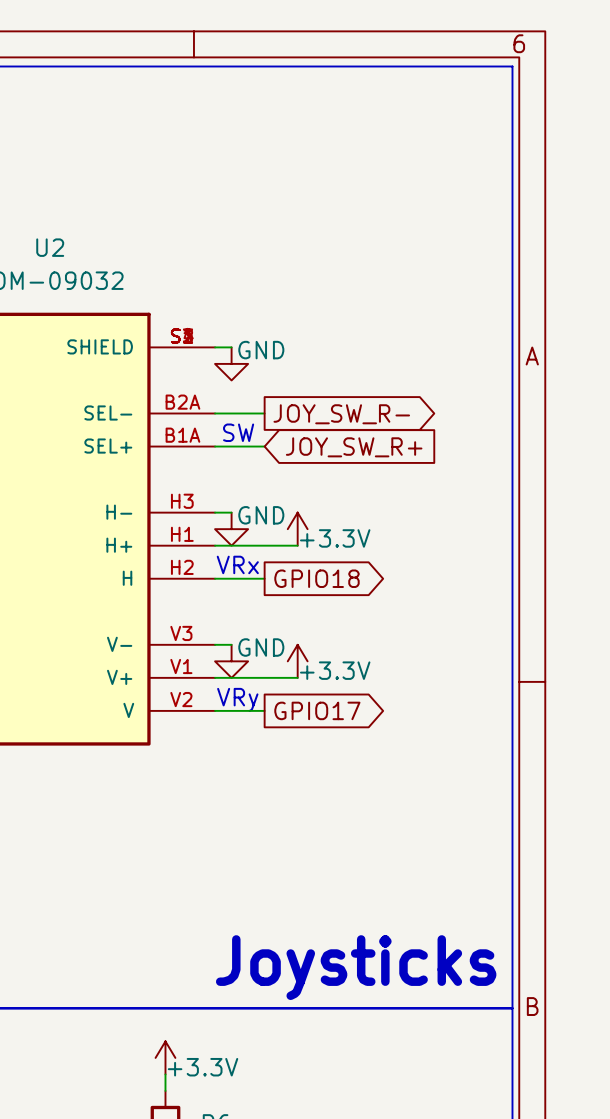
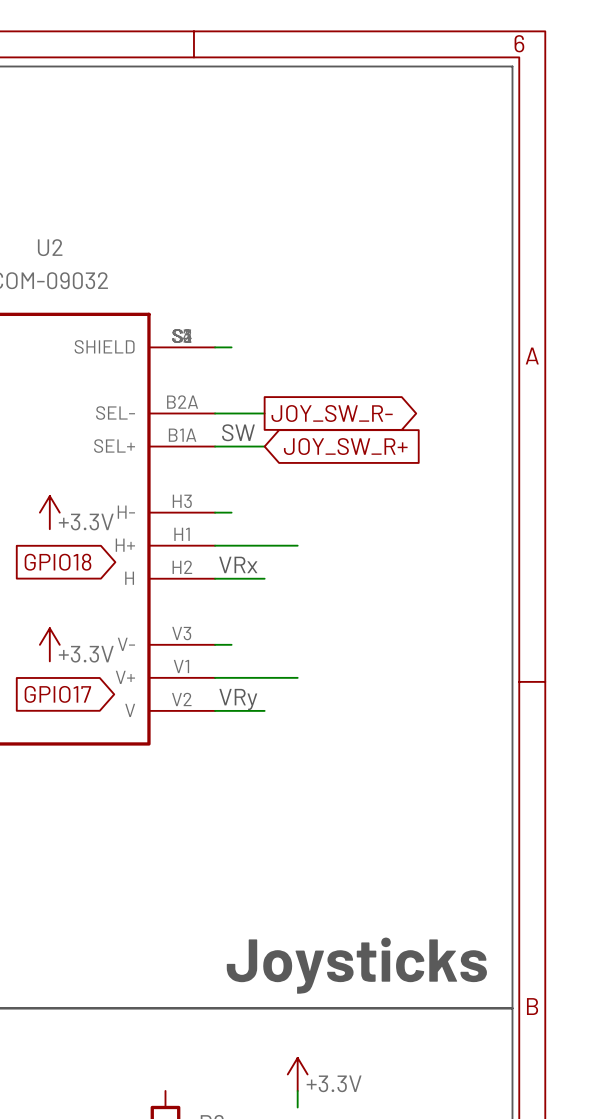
power symbol: GND (231, 363) -> none
power symbol: none -> +3.3V (49, 512)
power symbol: GND (231, 529) -> none
power symbol: +3.3V (297, 529) -> none
global label position: GPIO18 (316, 578) -> GPIO18 (58, 562)
power symbol: none -> +3.3V (49, 644)
power symbol: GND (231, 661) -> none
power symbol: +3.3V (297, 661) -> none
global label position: GPIO17 (317, 710) -> GPIO17 (57, 694)
power symbol: +3.3V (165, 1057) -> none
wire: (165, 1074) (165, 1090) -> (297, 1090) (297, 1107)
power symbol: none -> +3.3V (297, 1074)

